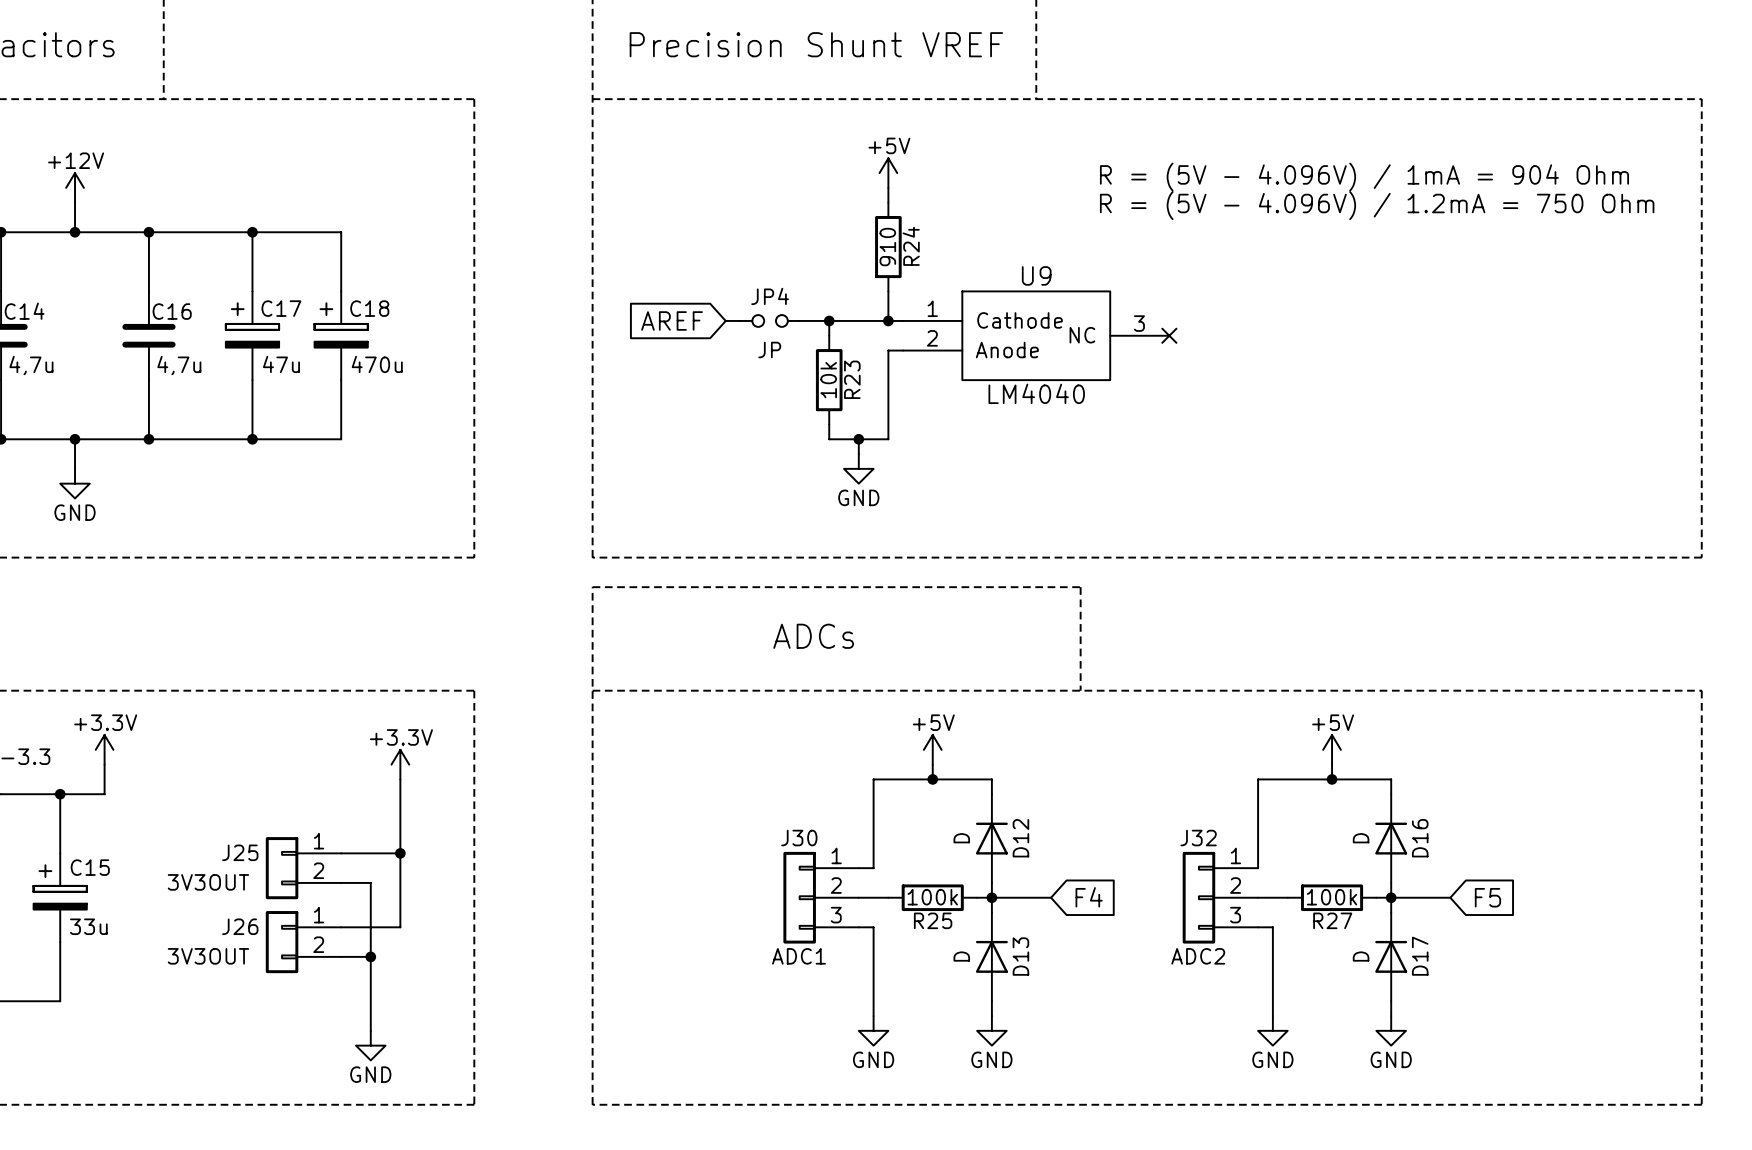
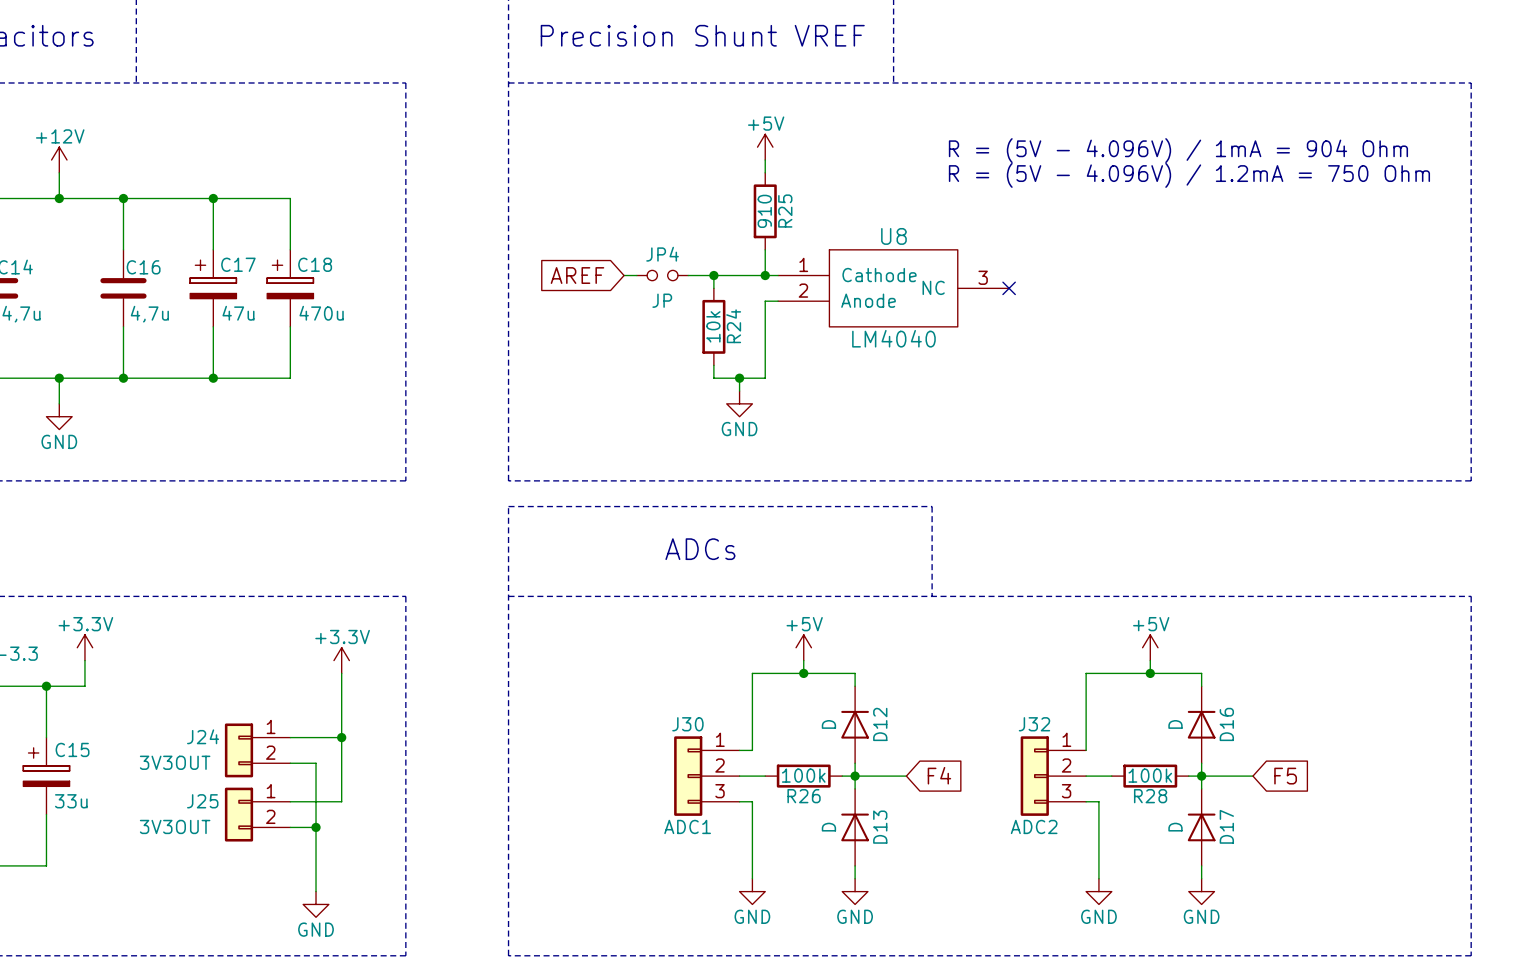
R24 name: R24 (911, 246) -> R25 (785, 211)
U9 name: U9 (1036, 275) -> U8 (893, 236)
R23 name: R23 (852, 379) -> R24 (733, 326)
J25 name: J25 (240, 852) -> J24 (203, 736)
R25 name: R25 (933, 920) -> R26 (804, 796)
R27 name: R27 (1332, 920) -> R28 (1150, 796)
J26 name: J26 (240, 926) -> J25 (202, 801)

